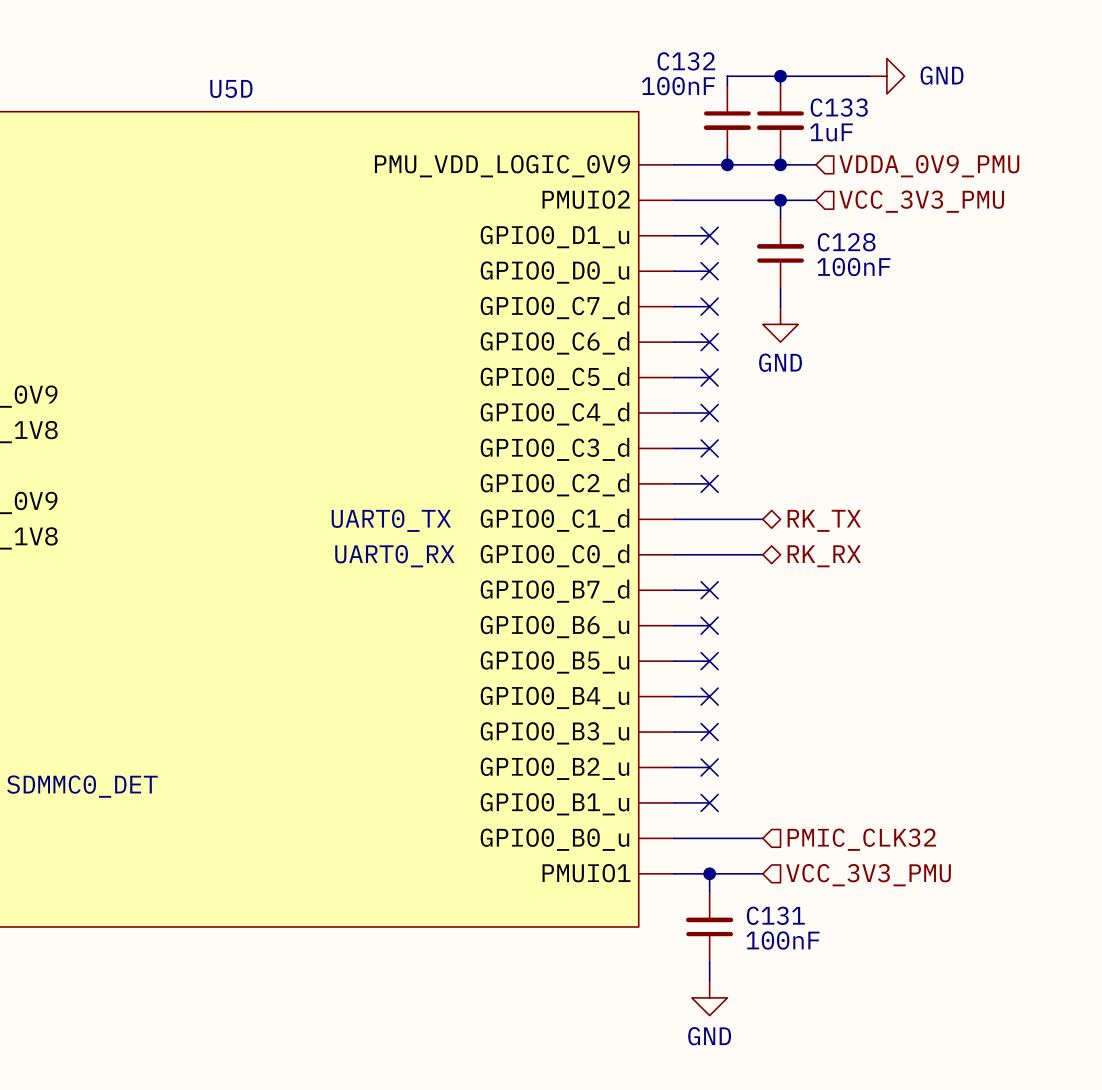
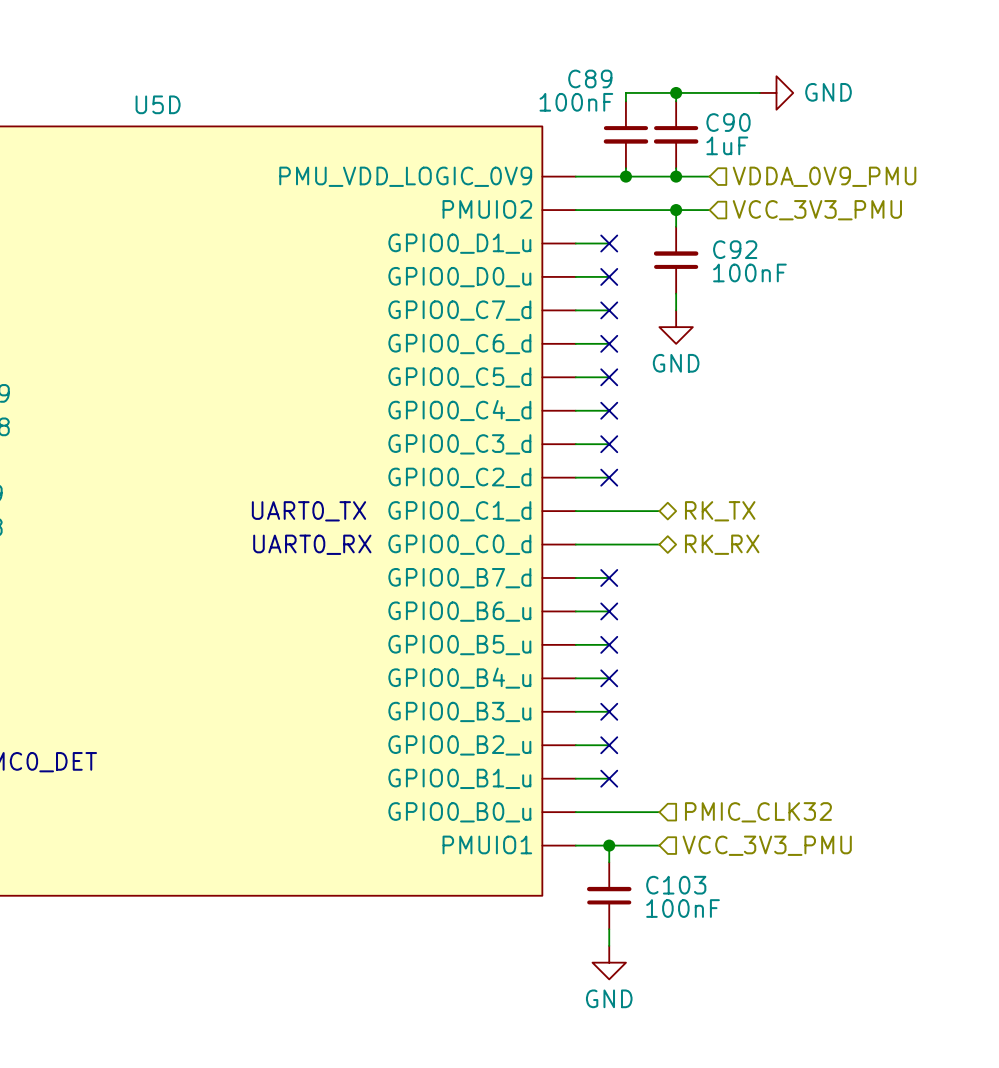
C132 name: C132 (686, 61) -> C89 (590, 78)
C133 name: C133 (839, 107) -> C90 (728, 122)
C128 name: C128 (846, 242) -> C92 (735, 249)
C131 name: C131 (775, 915) -> C103 (676, 885)

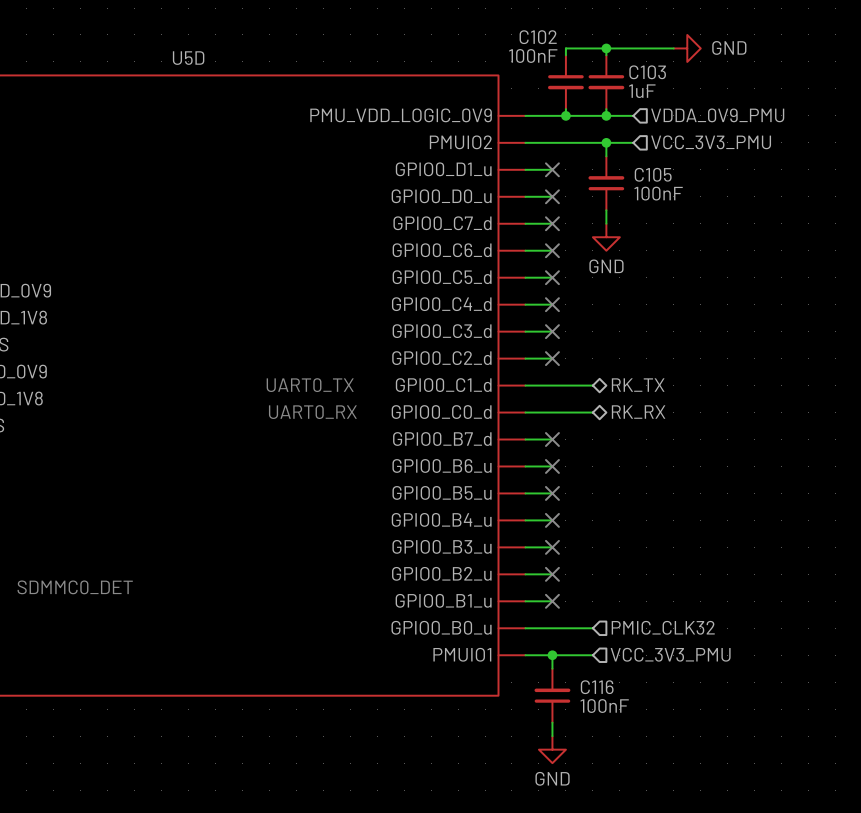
C89 name: C89 (590, 78) -> C102 (538, 37)
C90 name: C90 (728, 122) -> C103 (647, 72)
C92 name: C92 (735, 249) -> C105 (653, 174)
C103 name: C103 (676, 885) -> C116 (597, 687)

